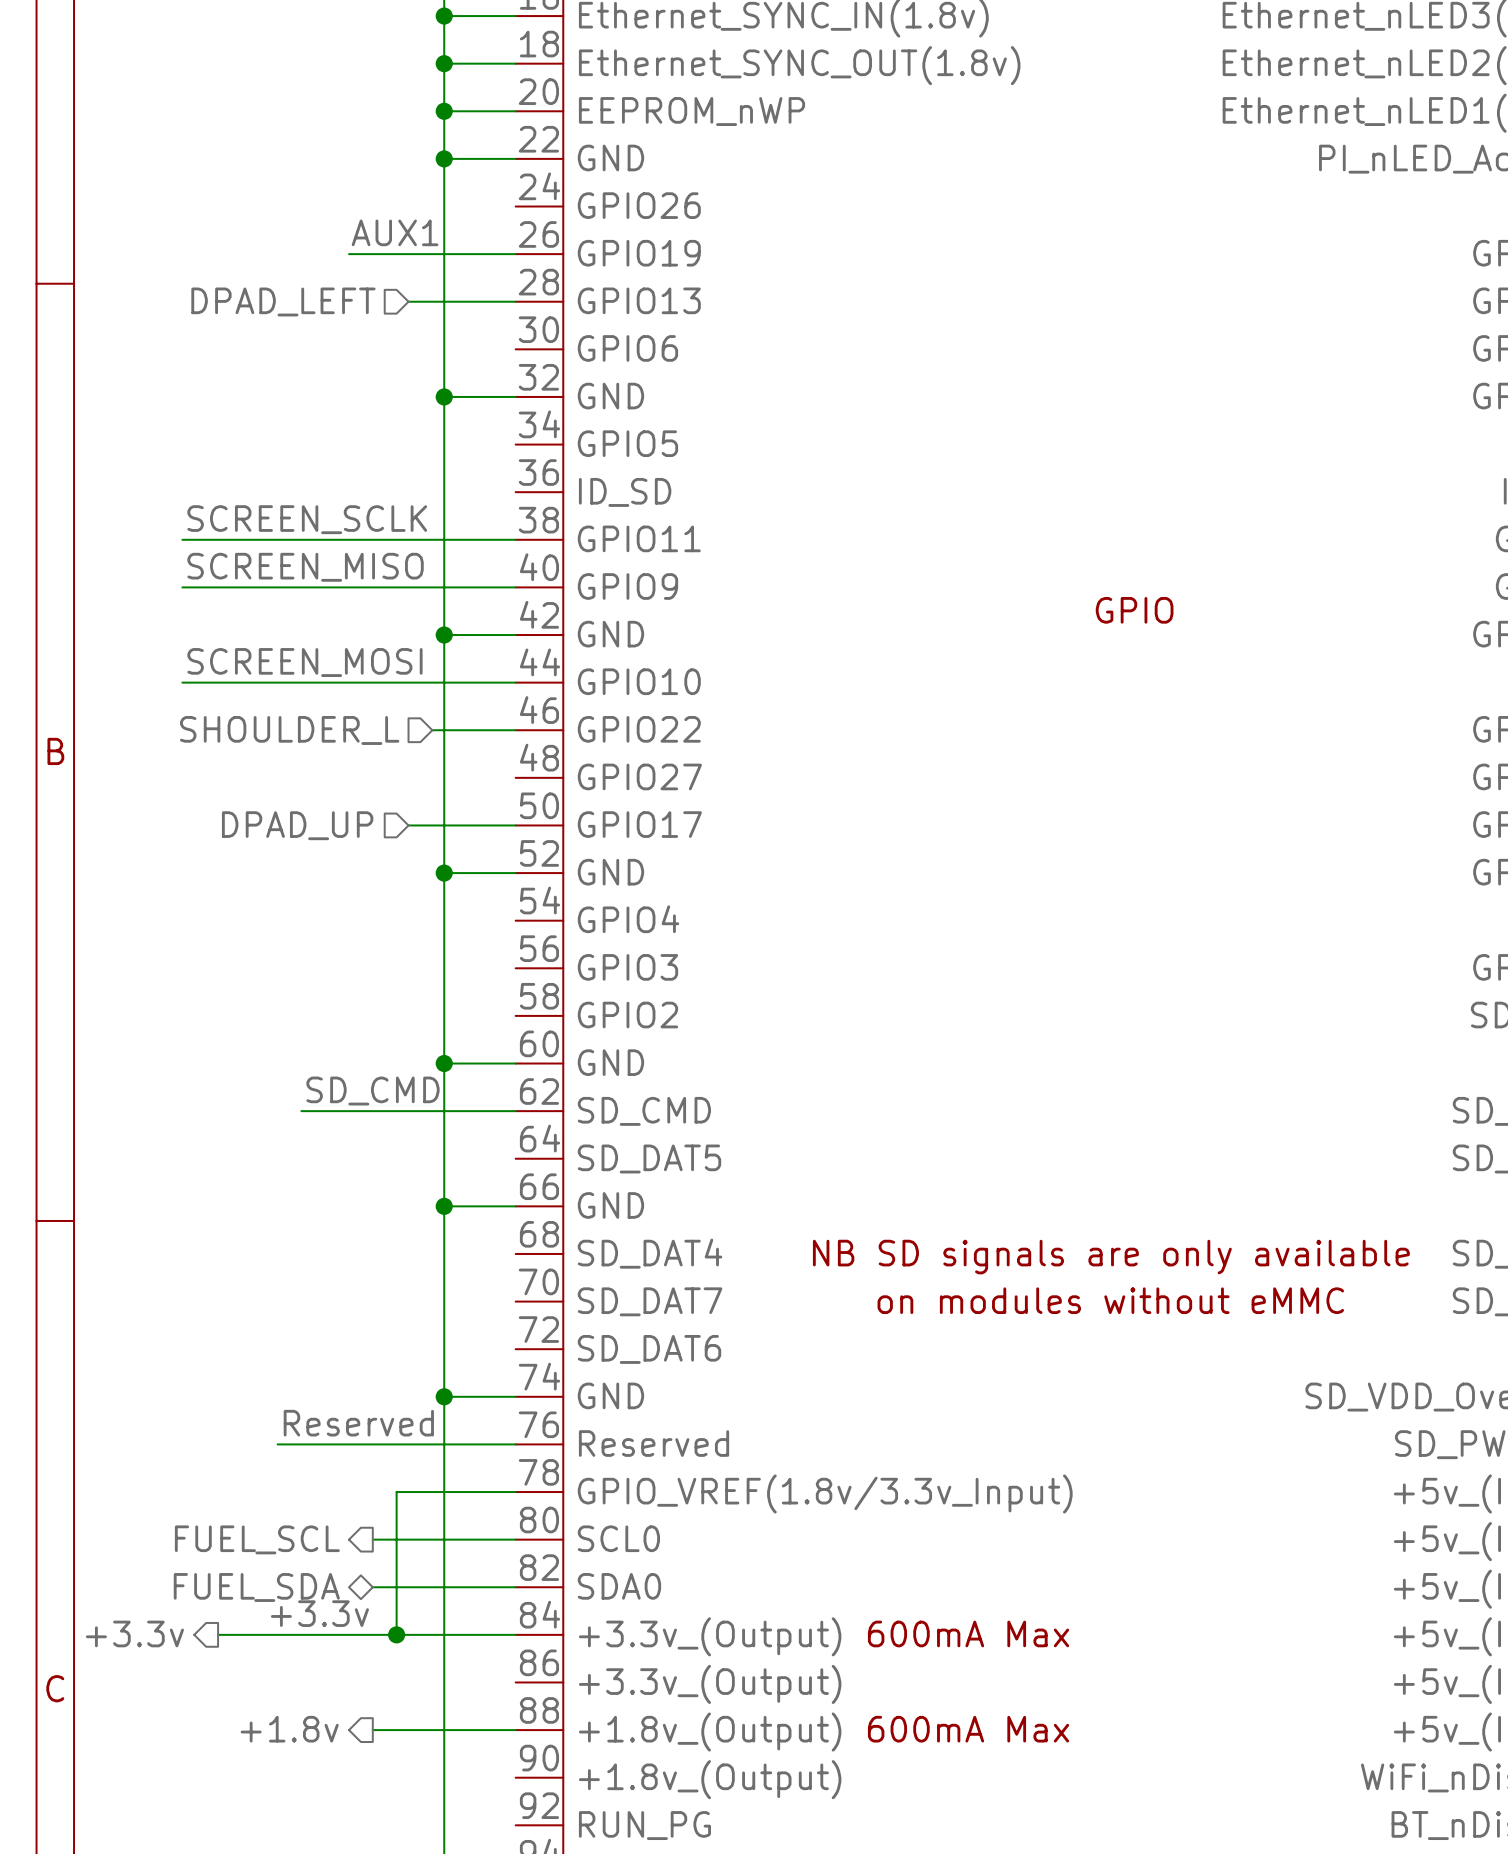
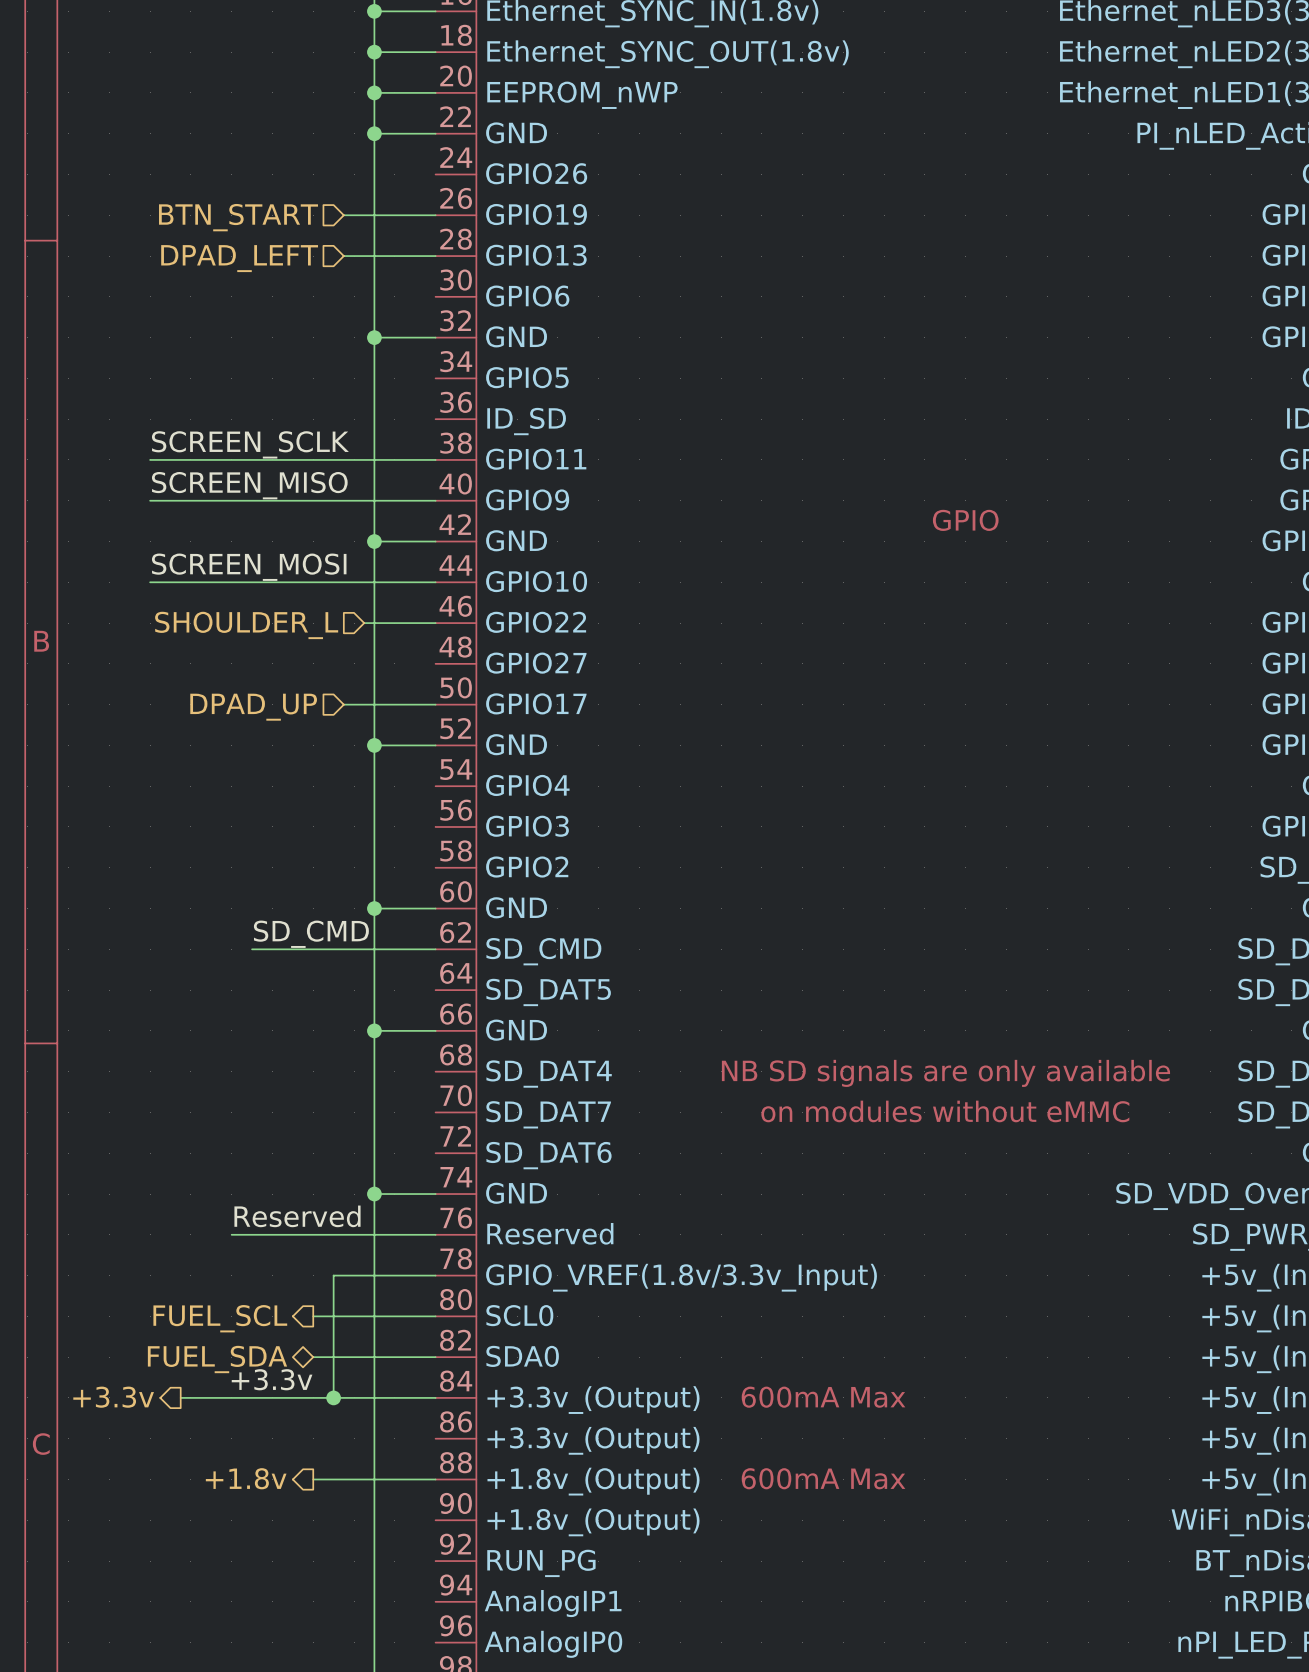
label: AUX1 (395, 232) -> none
hierarchical label: none -> BTN_START (238, 217)
wire: (349, 254) (408, 254) -> none

